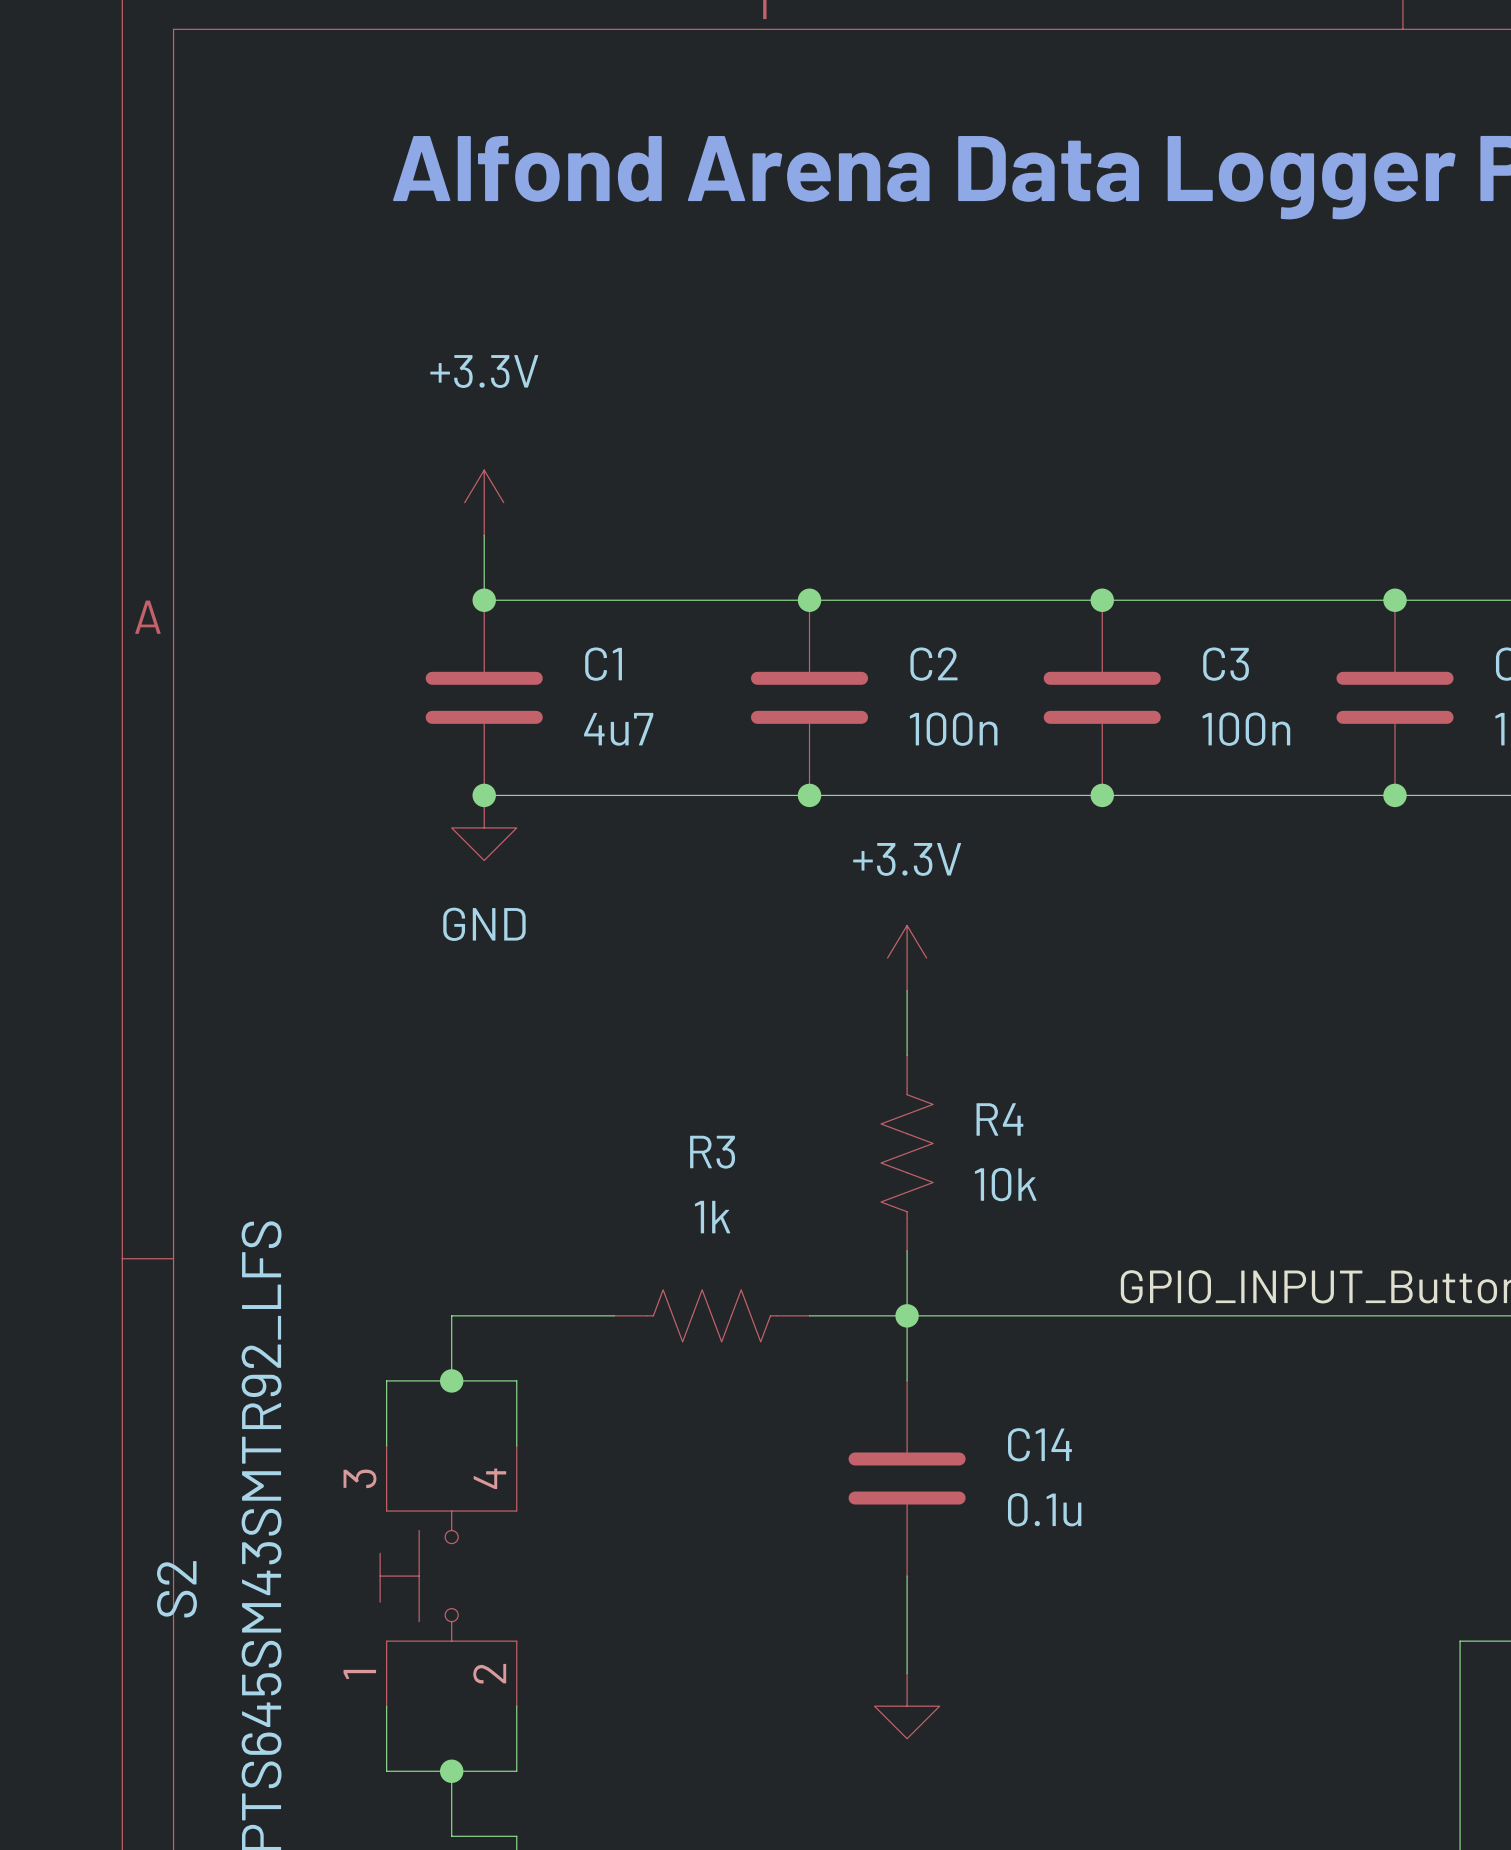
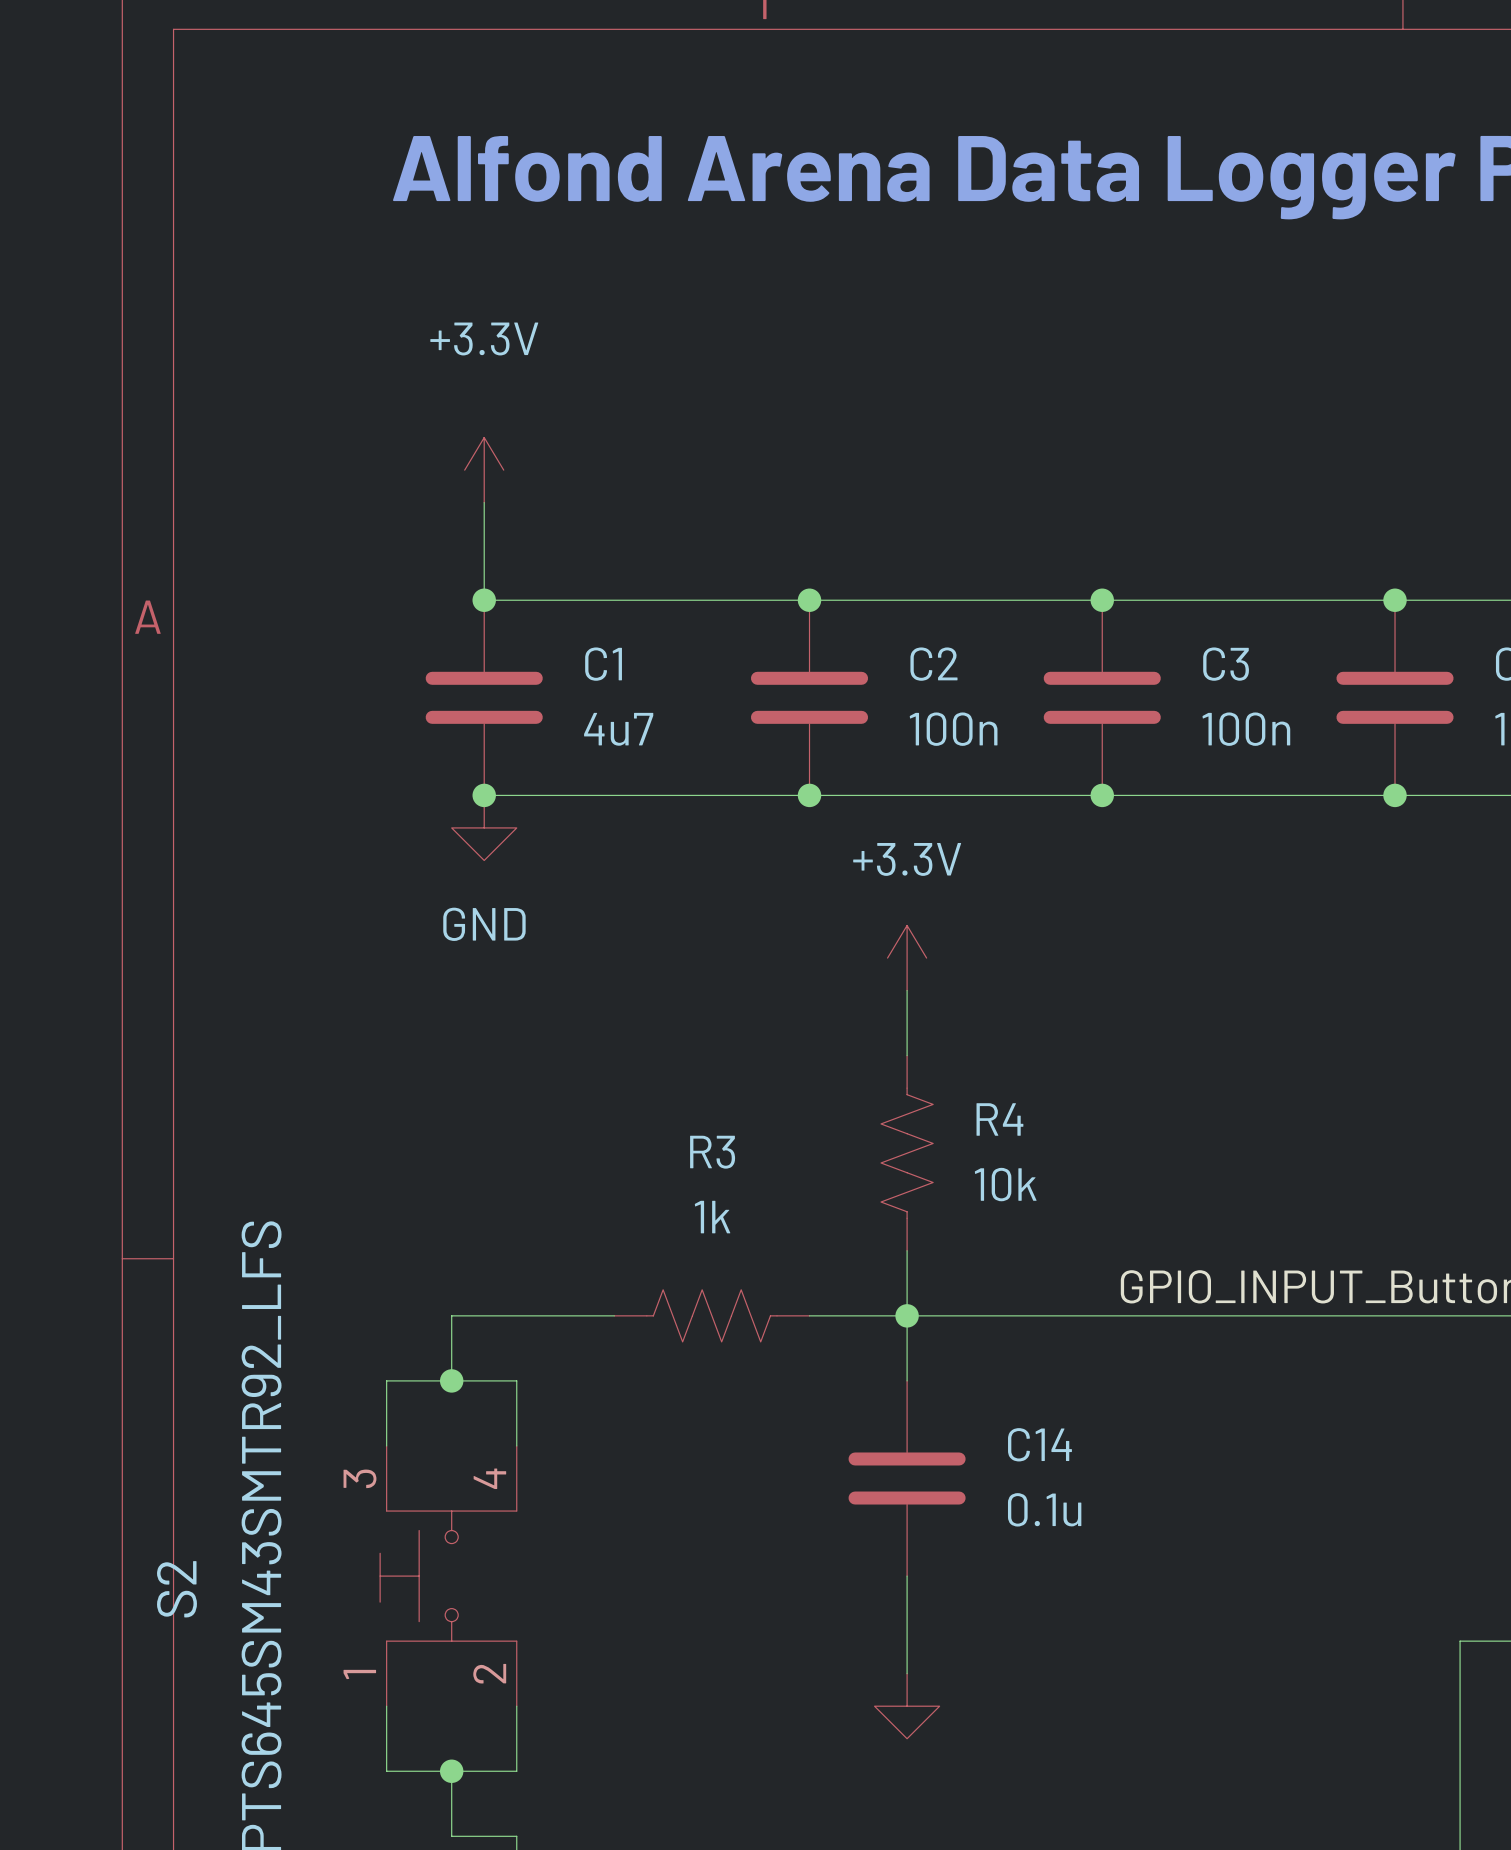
power symbol position: +3.3V (484, 502) -> +3.3V (484, 470)

